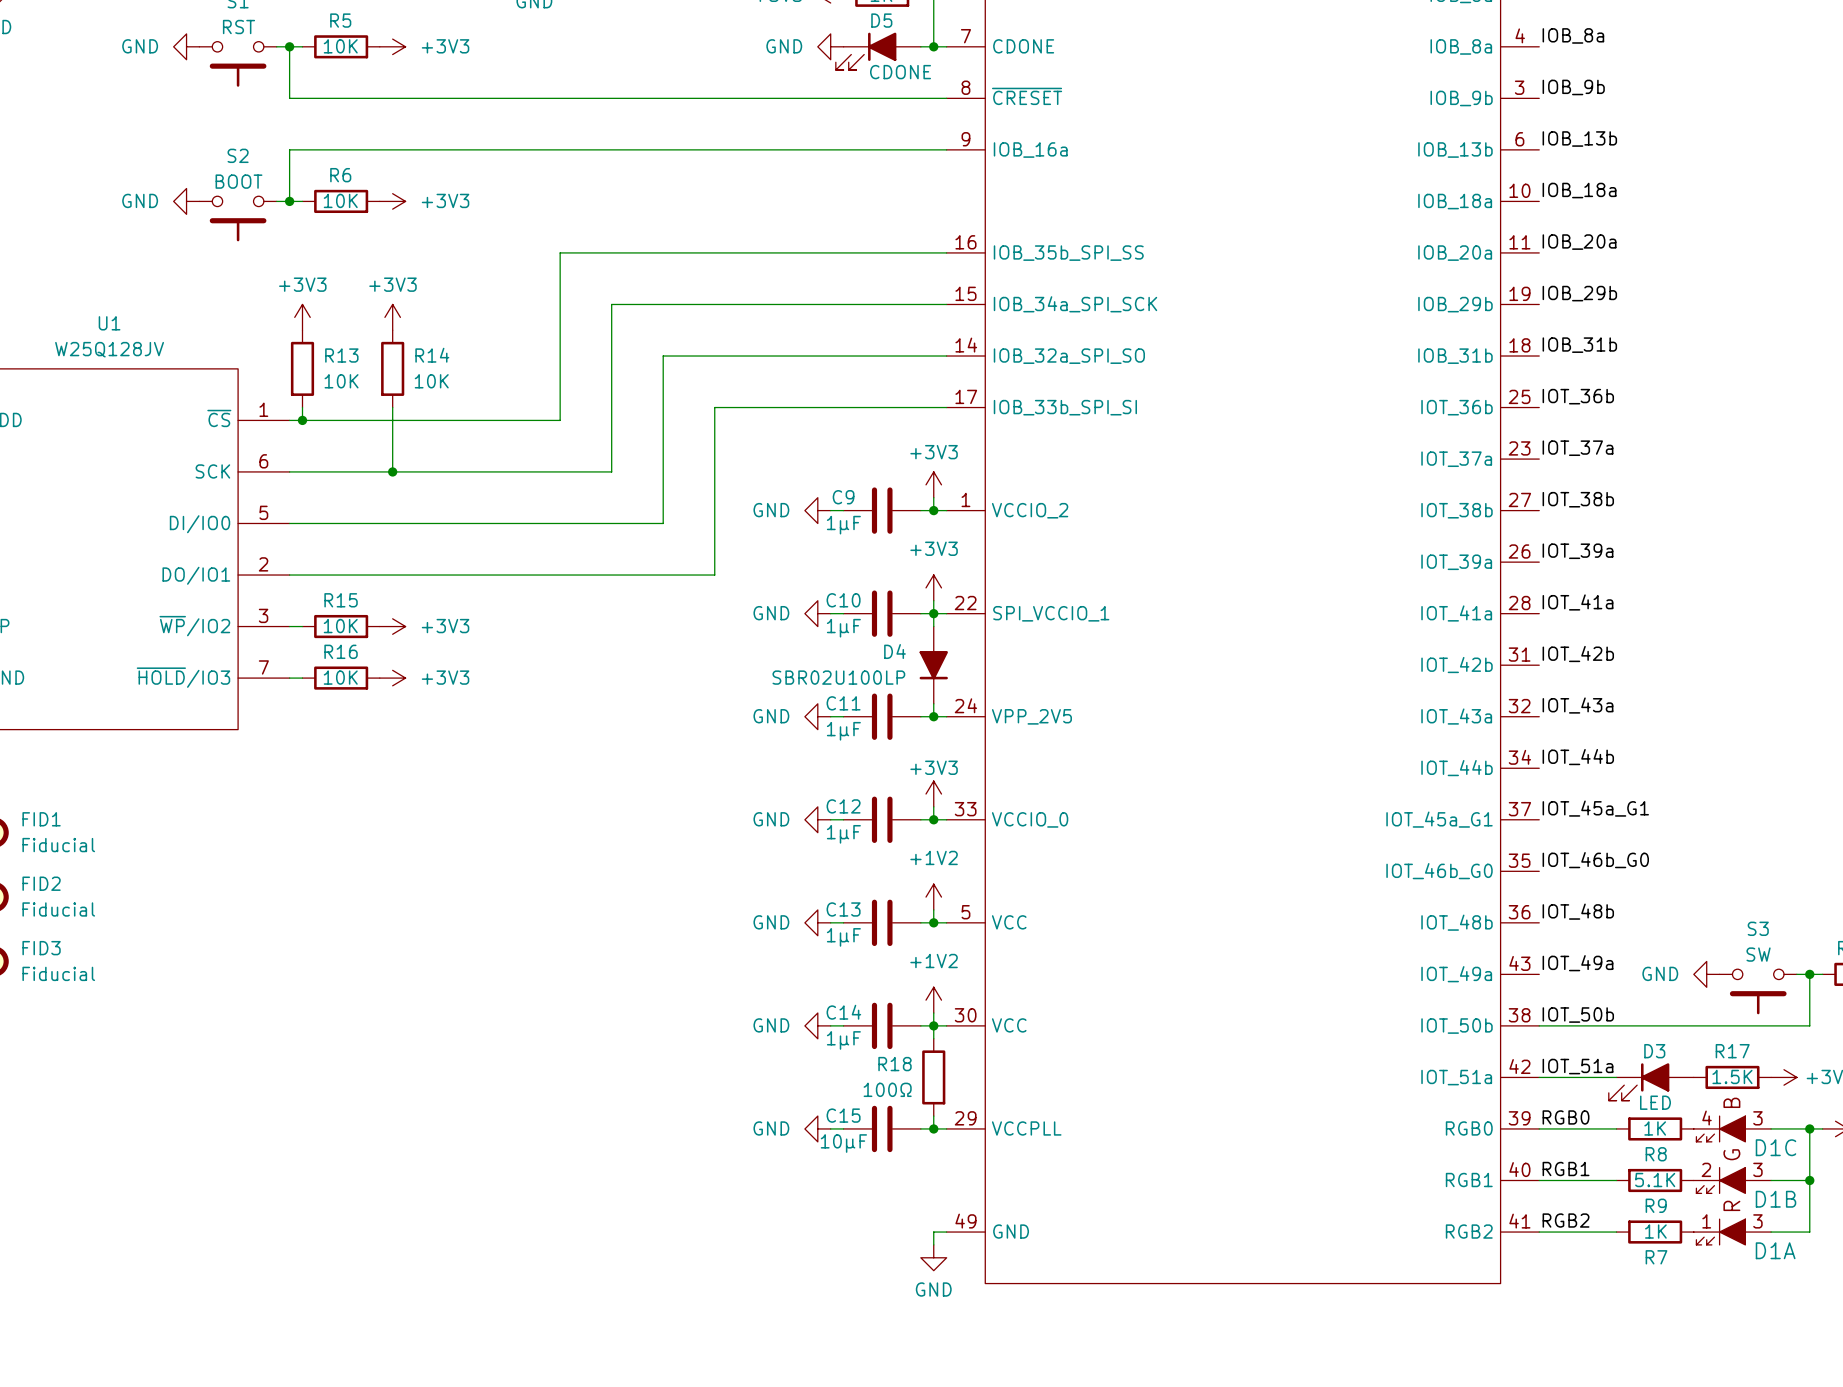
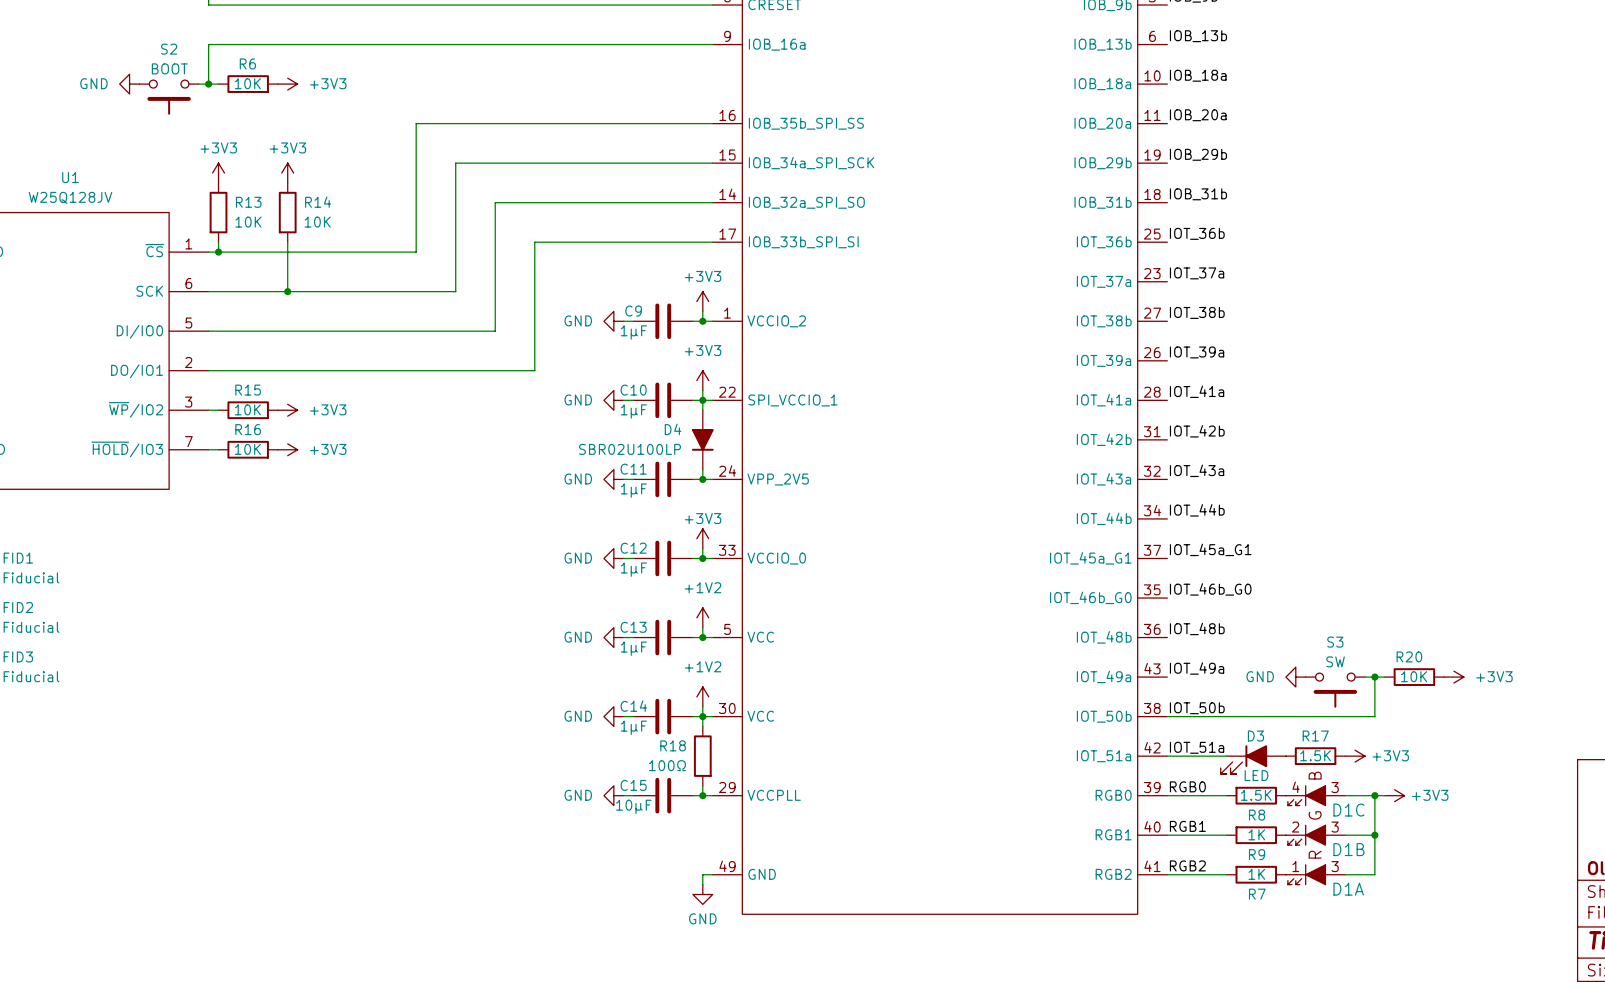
R8 value: 1K (1655, 1128) -> 1.5K (1256, 795)
R9 value: 5.1K (1655, 1180) -> 1K (1256, 834)

